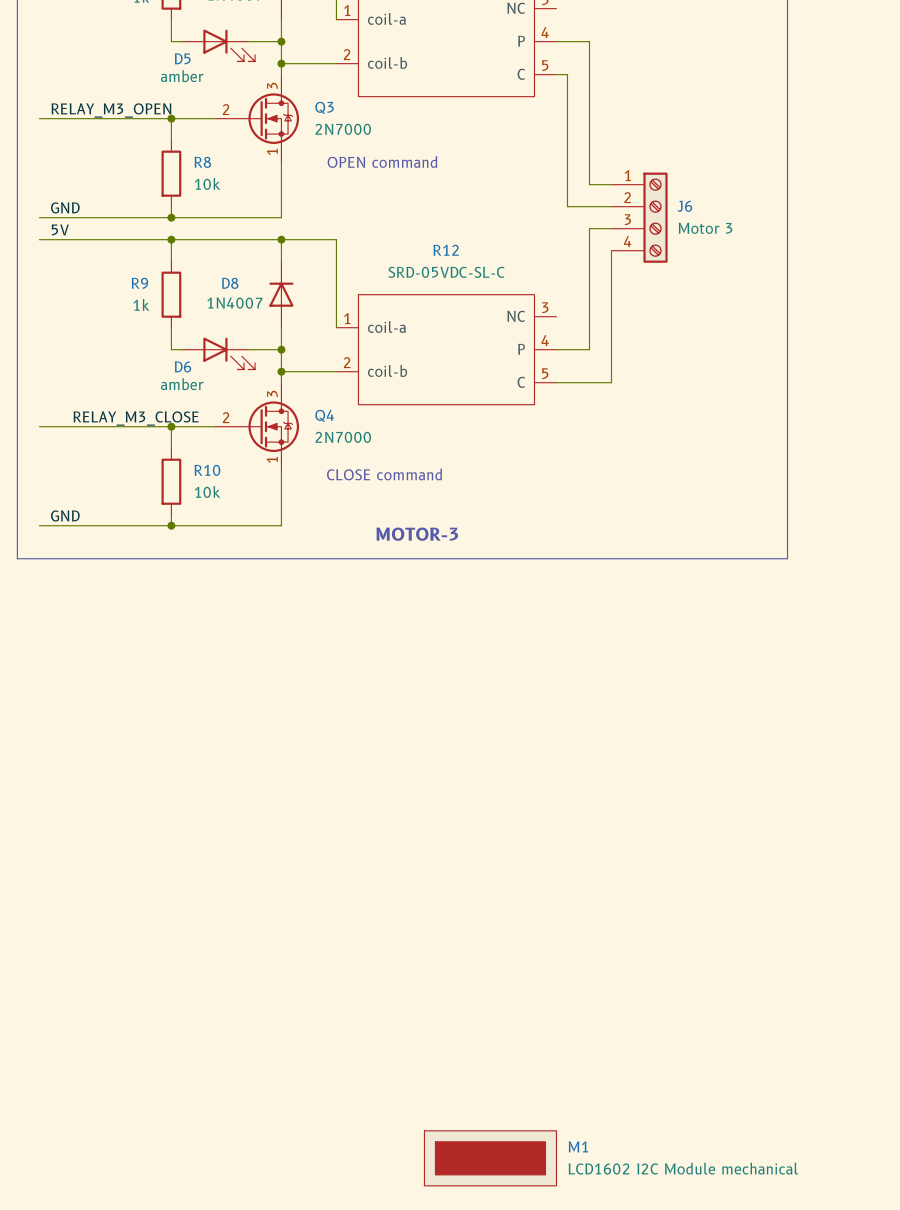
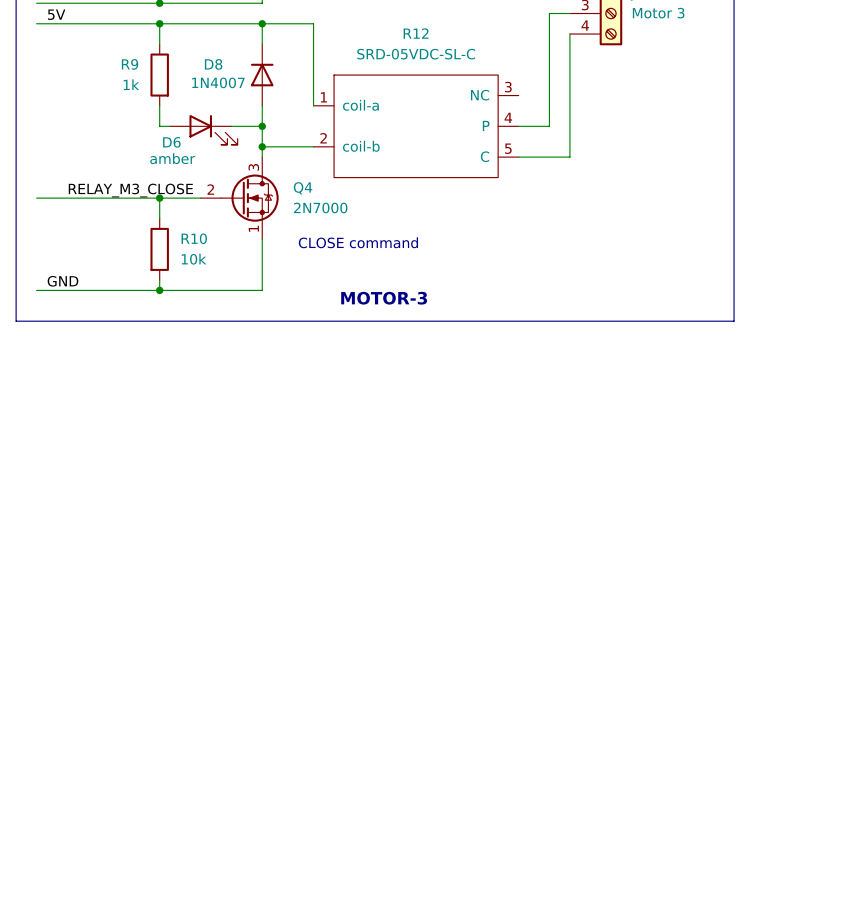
M1: LCD1602 I2C Module mechanical (490, 1158) -> none

